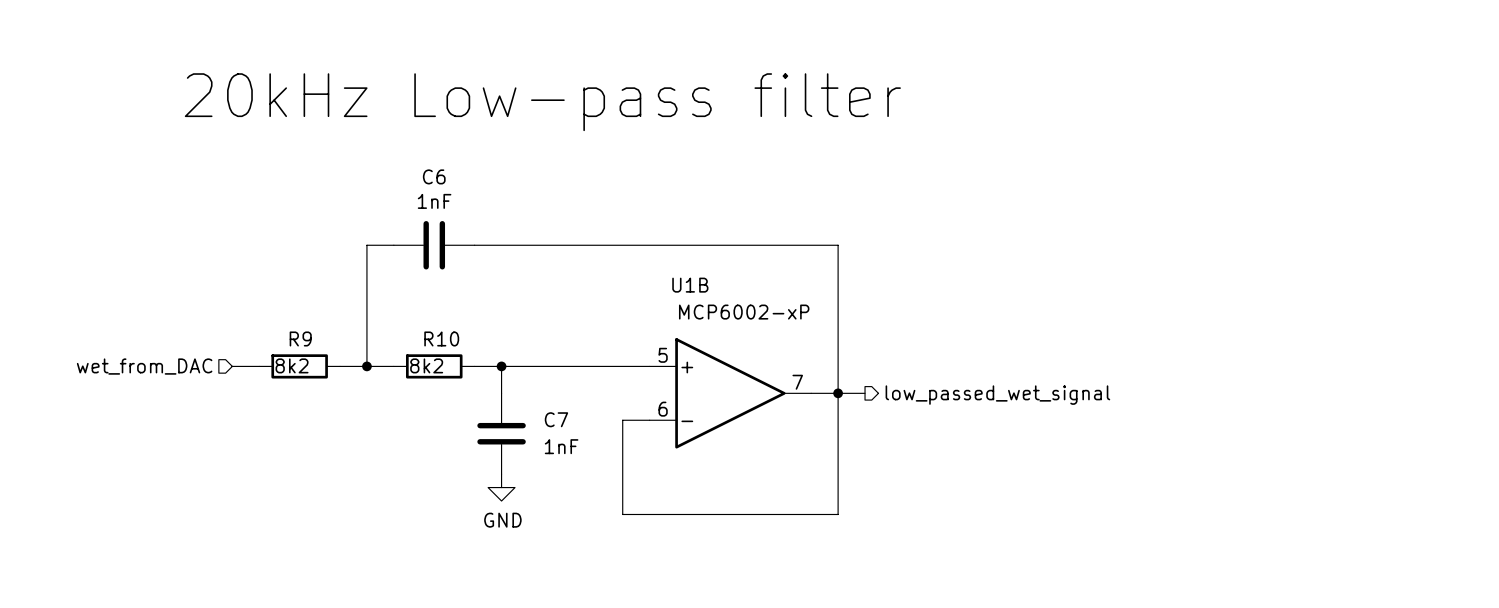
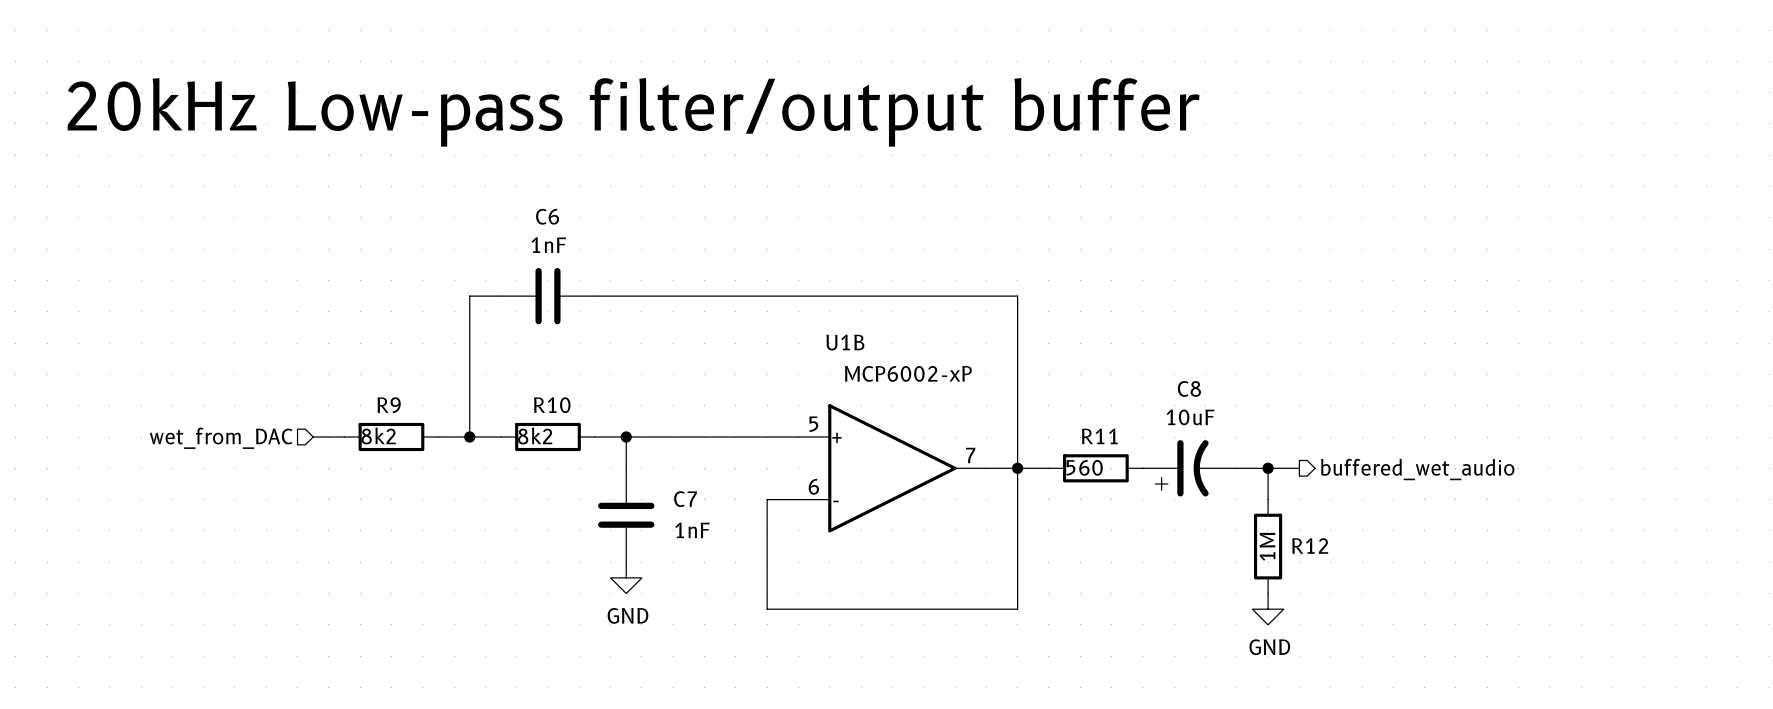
text: 20kHz Low-pass filter (542, 102) -> 20kHz Low-pass filter/output buffer (633, 112)
R11: none -> 560 (1095, 468)
C8: none -> 10uF (1189, 468)
wire: none -> (1236, 468) (1299, 468)
wire: none -> (1268, 468) (1268, 499)
junction: none -> (1268, 468)
hierarchical label: none -> buffered_wet_audio (1417, 469)
hierarchical label: low_passed_wet_signal (997, 395) -> none
R12: none -> 1M (1268, 546)
power symbol: none -> GND (1268, 609)

